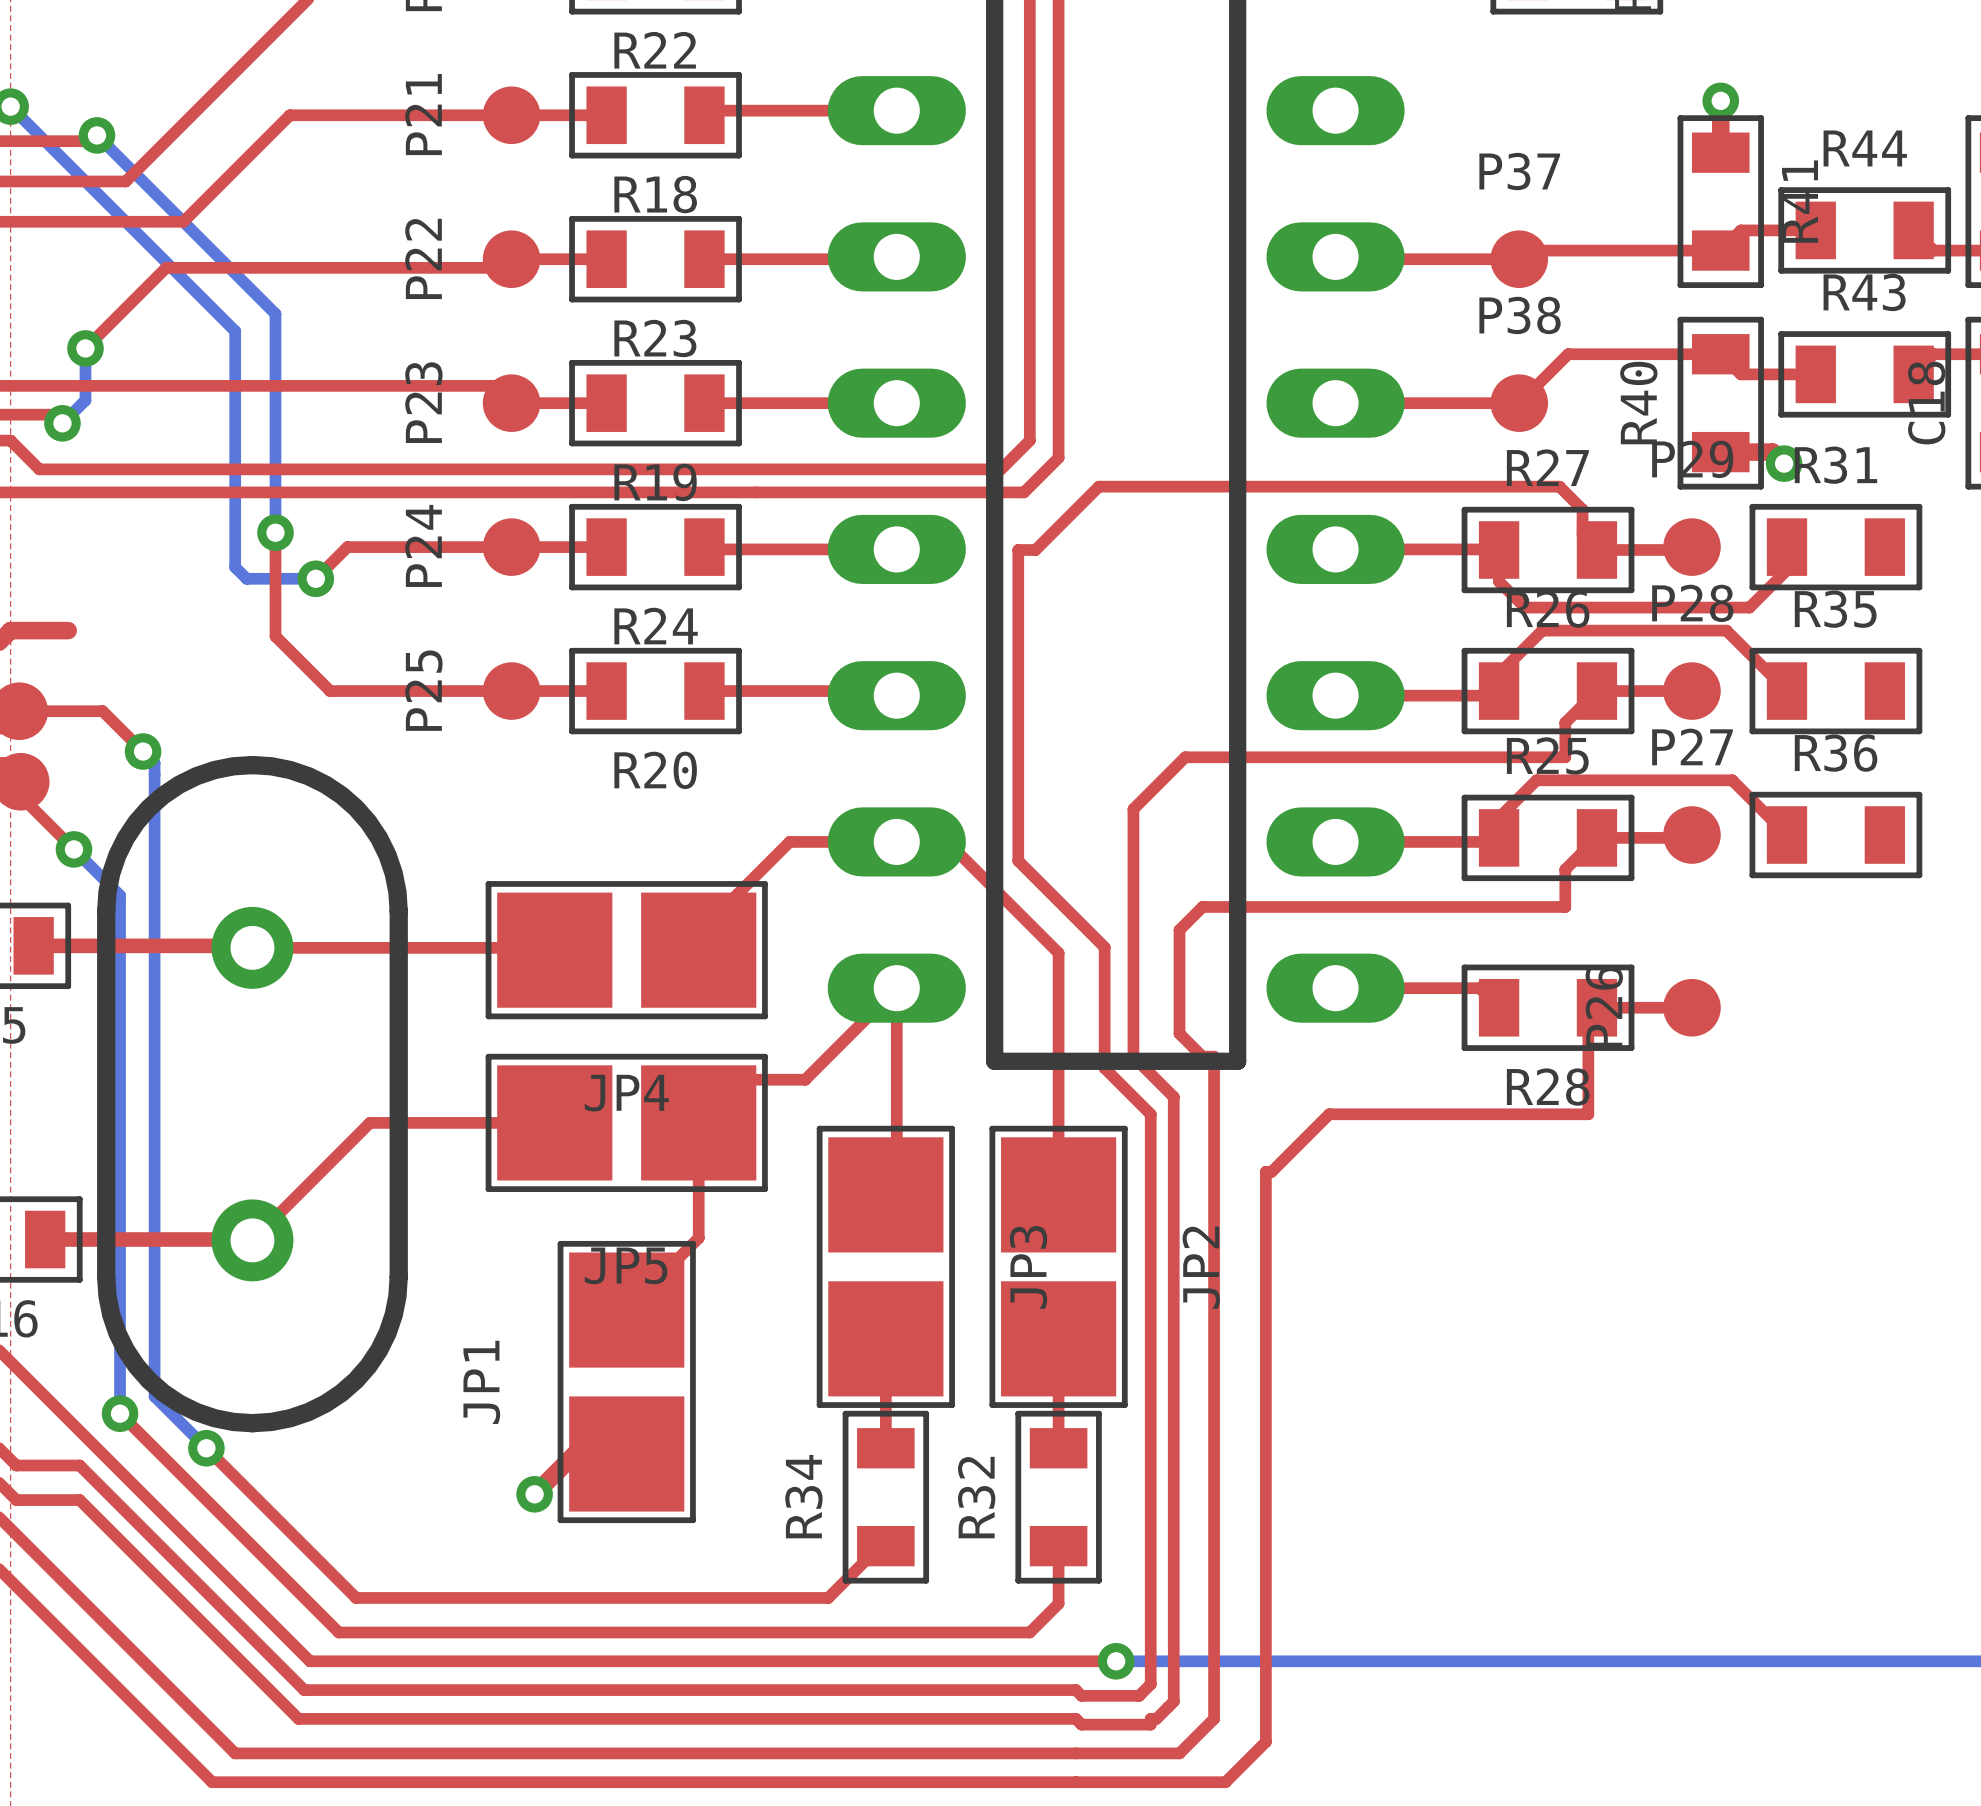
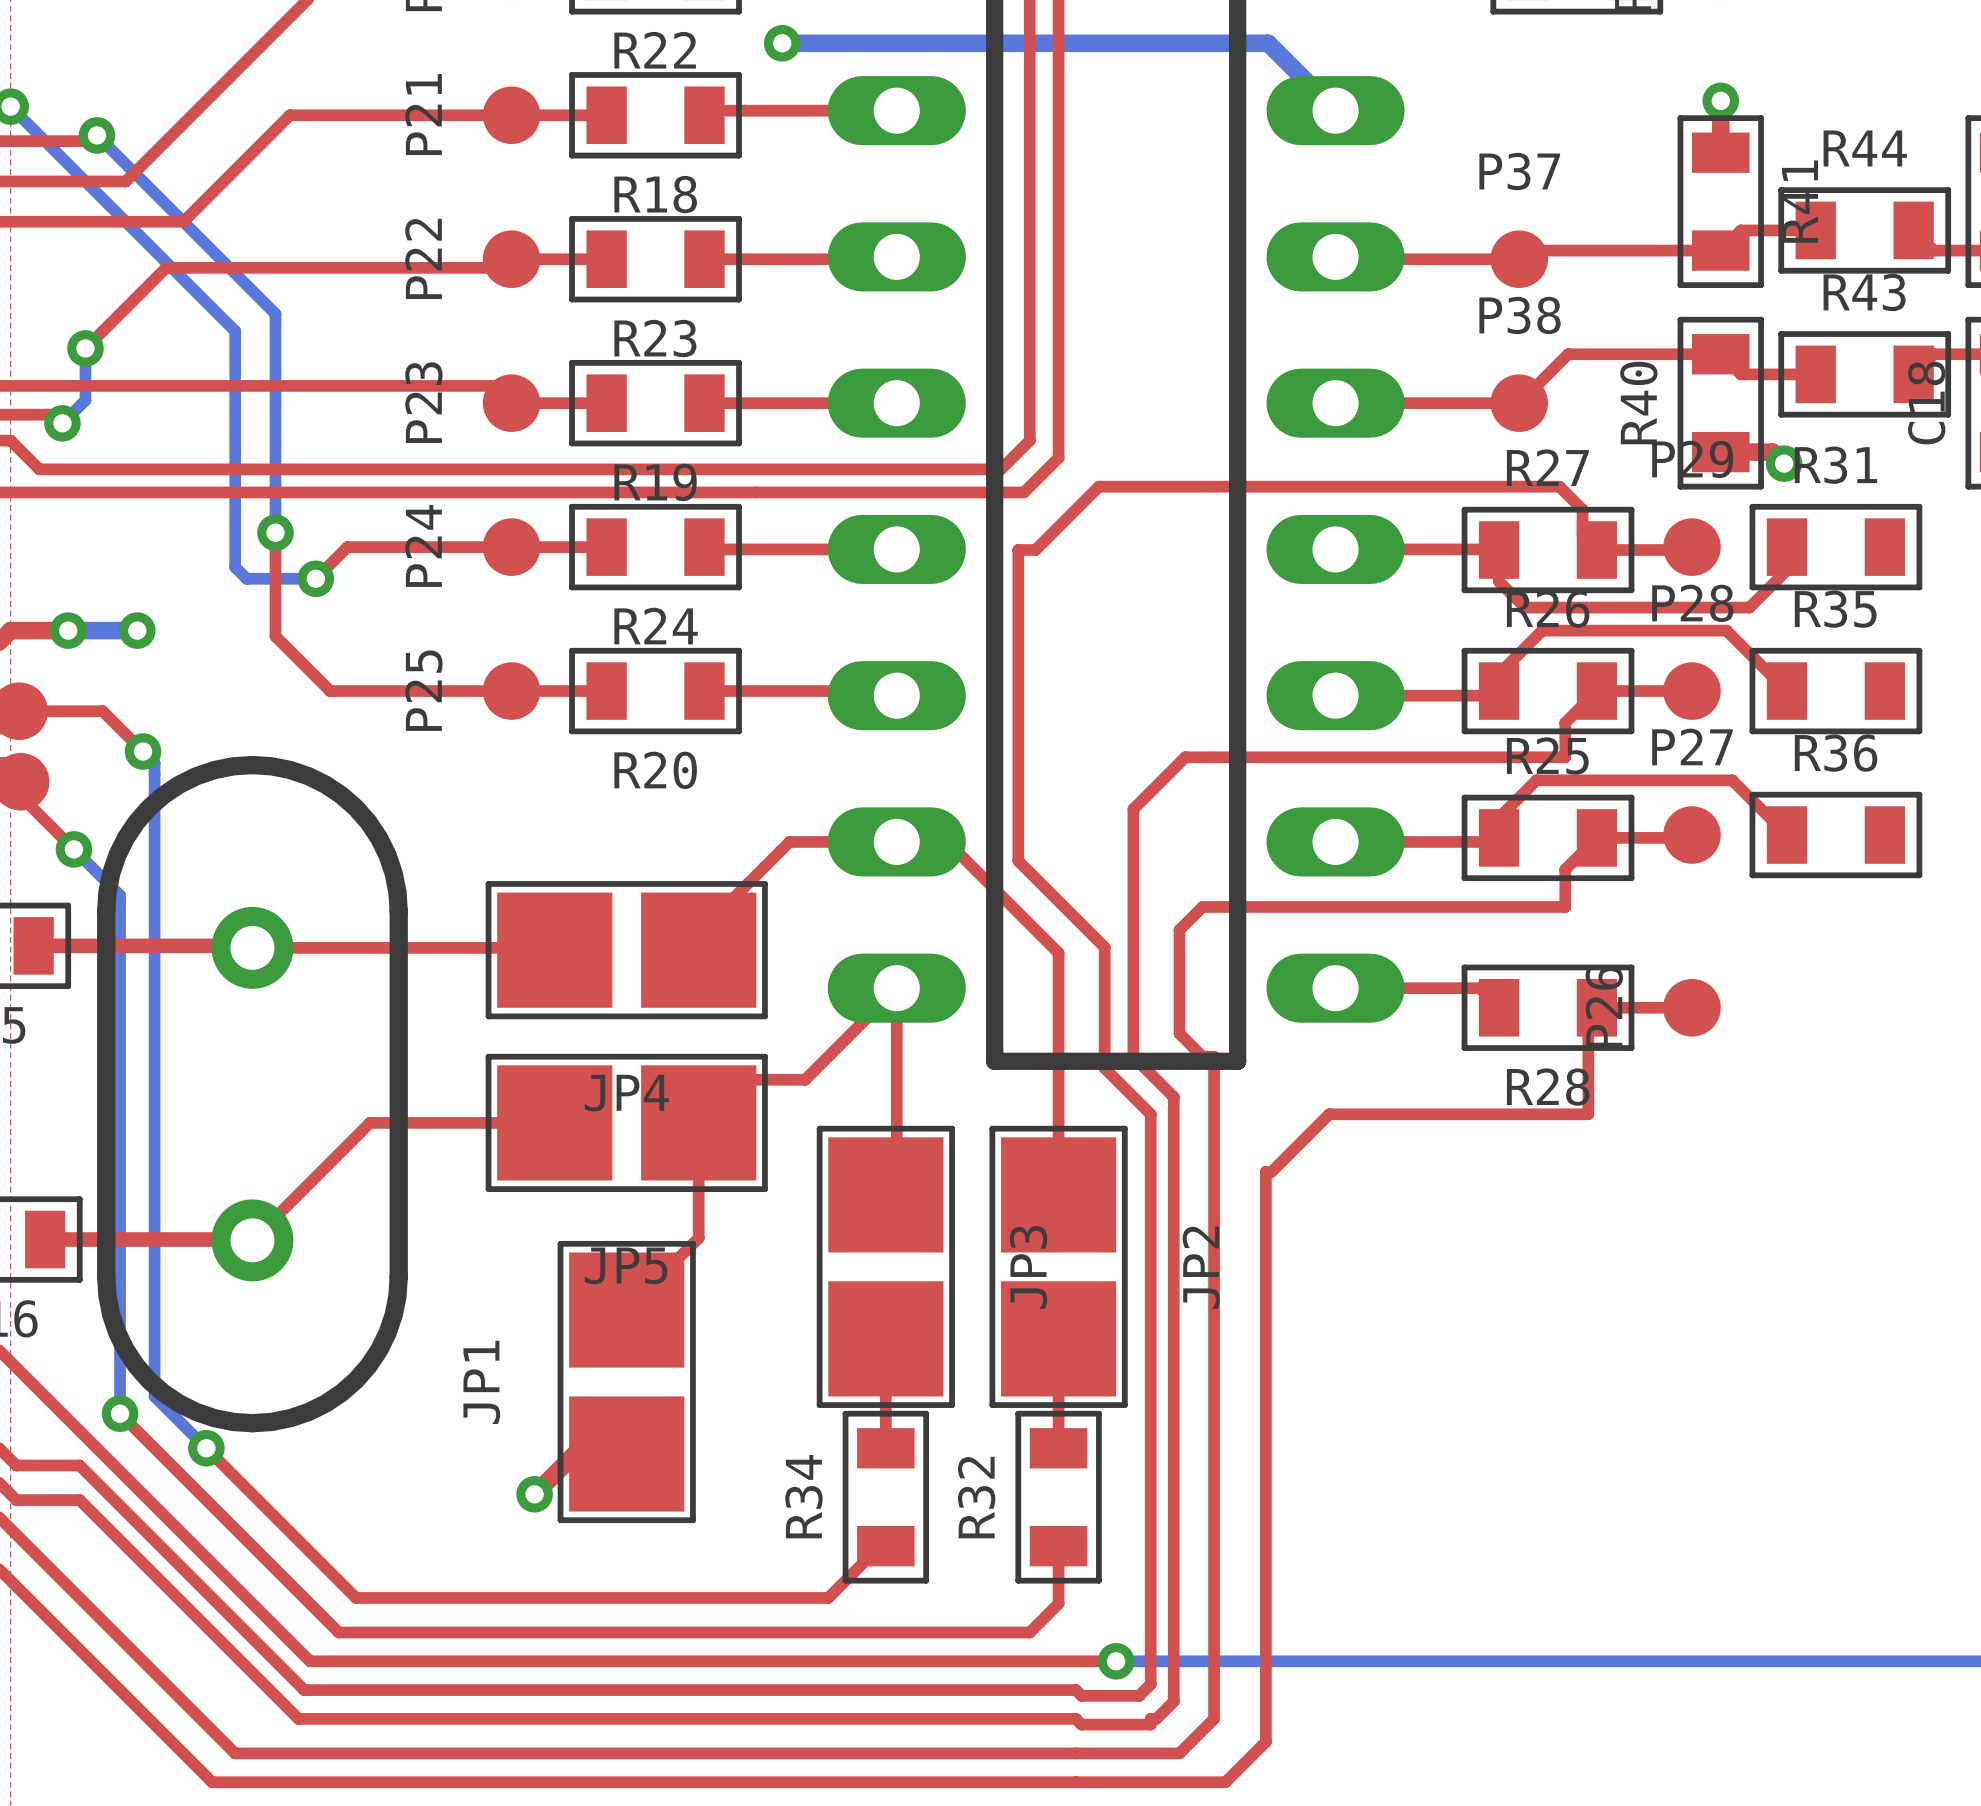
bottom track: none -> (782, 43) (1268, 43) (1335, 110)
via: none -> (782, 43)
bottom track: none -> (68, 630) (137, 630)
via: none -> (68, 630)
via: none -> (137, 630)

